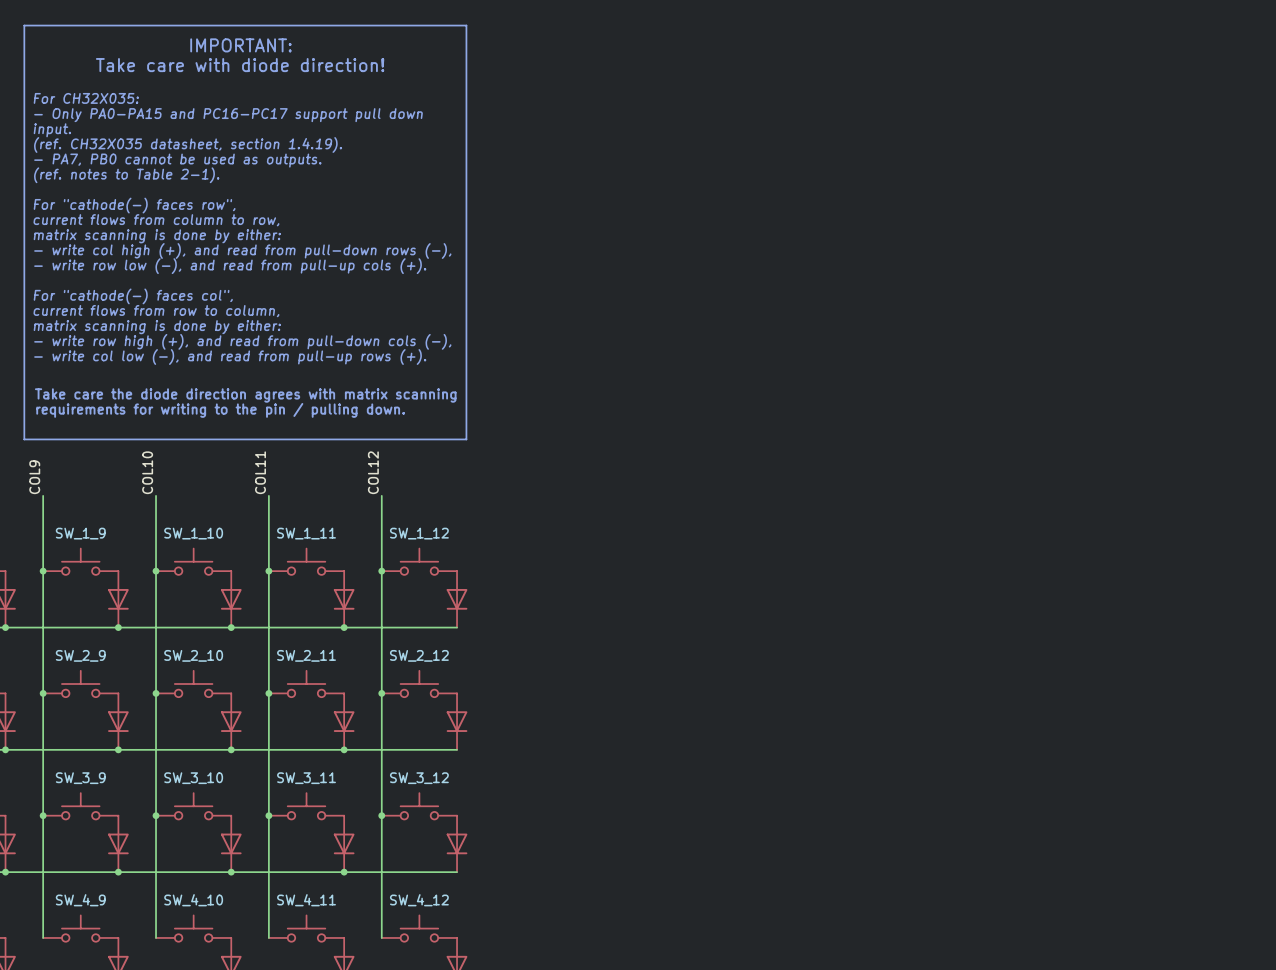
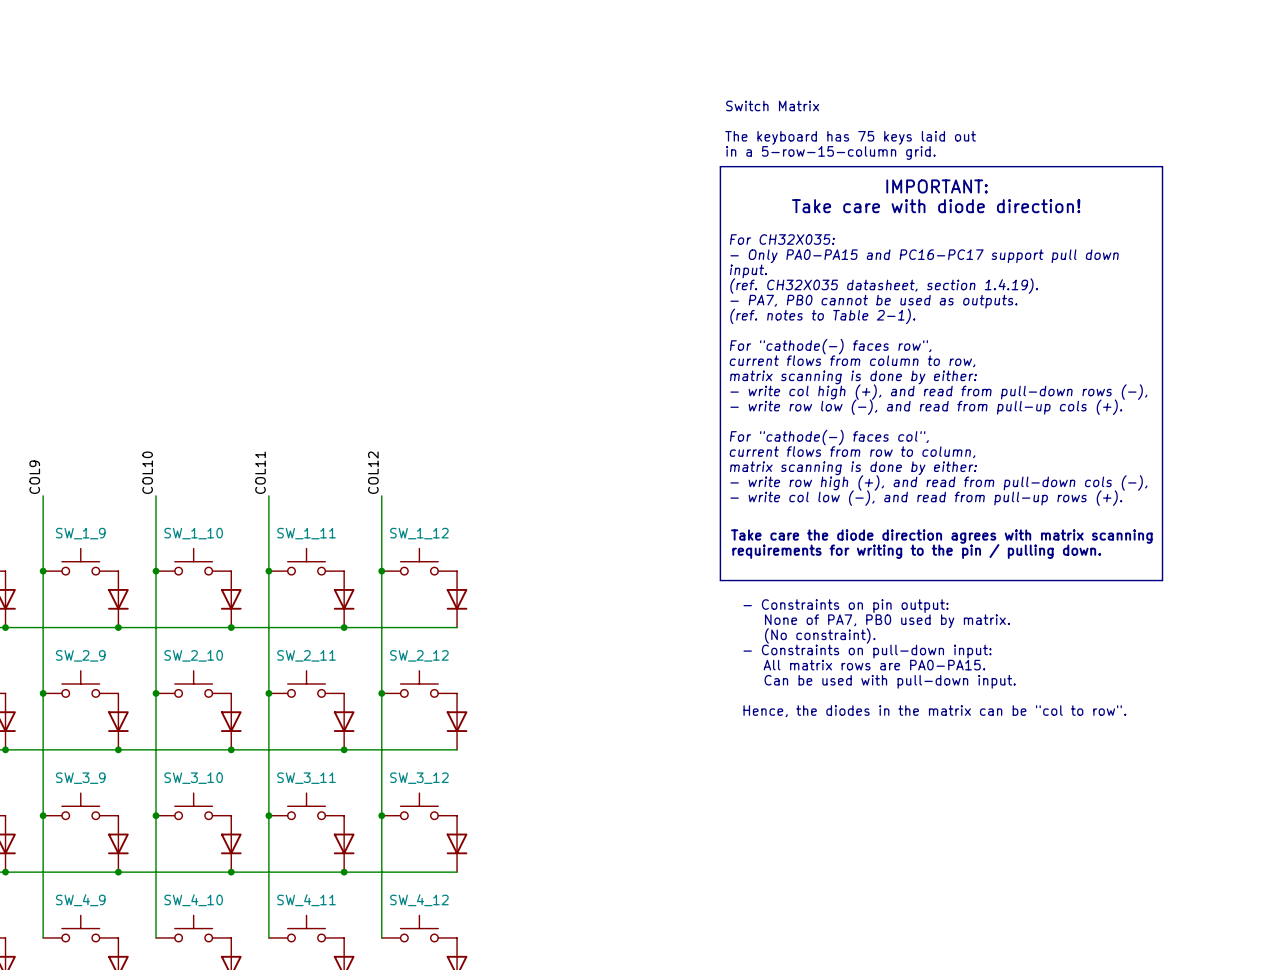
line: (24, 25) (466, 25) (466, 439) (24, 439) (24, 25) -> none
text: IMPORTANT: (240, 45) -> none
text: Take care with diode direction! (240, 65) -> none
text: For CH32X035: (86, 98) -> none
text: none -> Switch Matrix (772, 105)
text: - Only PA0-PA15 and PC16-PC17 support pull down (228, 115) -> none
text: input. (52, 130) -> none
text: none -> The keyboard has 75 keys laid out (850, 137)
text: (ref. CH32X035 datasheet, section 1.4.19). (188, 144) -> none
text: none -> in a 5-row-15-column grid. (830, 152)
text: - PA7, PB0 cannot be used as outputs. (177, 160) -> none
line: none -> (720, 166) (1162, 166) (1162, 580) (720, 580) (720, 166)
text: (ref. notes to Table 2-1). (126, 175) -> none
text: none -> IMPORTANT: (937, 186)
text: For "cathode(-) faces row", (134, 205) -> none
text: none -> Take care with diode direction! (936, 206)
text: current flows from column to row, (156, 220) -> none
text: matrix scanning is done by either: (157, 236) -> none
text: none -> For CH32X035: (782, 239)
text: - write col high (+), and read from pull-down rows (-), (242, 250) -> none
text: none -> - Only PA0-PA15 and PC16-PC17 support pull down (924, 256)
text: - write row low (-), and read from pull-up cols (+). (230, 266) -> none
text: none -> input. (748, 271)
text: none -> (ref. CH32X035 datasheet, section 1.4.19). (884, 286)
text: For "cathode(-) faces col", (133, 296) -> none
text: none -> - PA7, PB0 cannot be used as outputs. (873, 301)
text: current flows from row to column, (156, 311) -> none
text: none -> (ref. notes to Table 2-1). (822, 316)
text: matrix scanning is done by either: (157, 327) -> none
text: - write row high (+), and read from pull-down cols (-), (242, 341) -> none
text: none -> For "cathode(-) faces row", (830, 346)
text: - write col low (-), and read from pull-up rows (+). (230, 357) -> none
text: none -> current flows from column to row, (852, 361)
text: none -> matrix scanning is done by either: (853, 377)
text: none -> - write col high (+), and read from pull-down rows (-), (938, 392)
text: Take care the diode direction agrees with matrix scanning (245, 395) -> none
text: none -> - write row low (-), and read from pull-up cols (+). (926, 407)
text: requirements for writing to the pin / pulling down. (220, 410) -> none
text: none -> For "cathode(-) faces col", (829, 437)
text: none -> current flows from row to column, (852, 452)
text: none -> matrix scanning is done by either: (853, 468)
text: none -> - write row high (+), and read from pull-down cols (-), (938, 482)
text: none -> - write col low (-), and read from pull-up rows (+). (926, 498)
text: none -> Take care the diode direction agrees with matrix scanning (941, 536)
text: none -> requirements for writing to the pin / pulling down. (916, 551)
text: none -> - Constraints on pin output: (845, 606)
text: none -> None of PA7, PB0 used by matrix. (887, 621)
text: none -> (No constraint). (820, 635)
text: none -> - Constraints on pull-down input: (867, 651)
text: none -> All matrix rows are PA0-PA15. (874, 665)
text: none -> Can be used with pull-down input. (890, 681)
text: none -> Hence, the diodes in the matrix can be "col to row". (934, 711)

